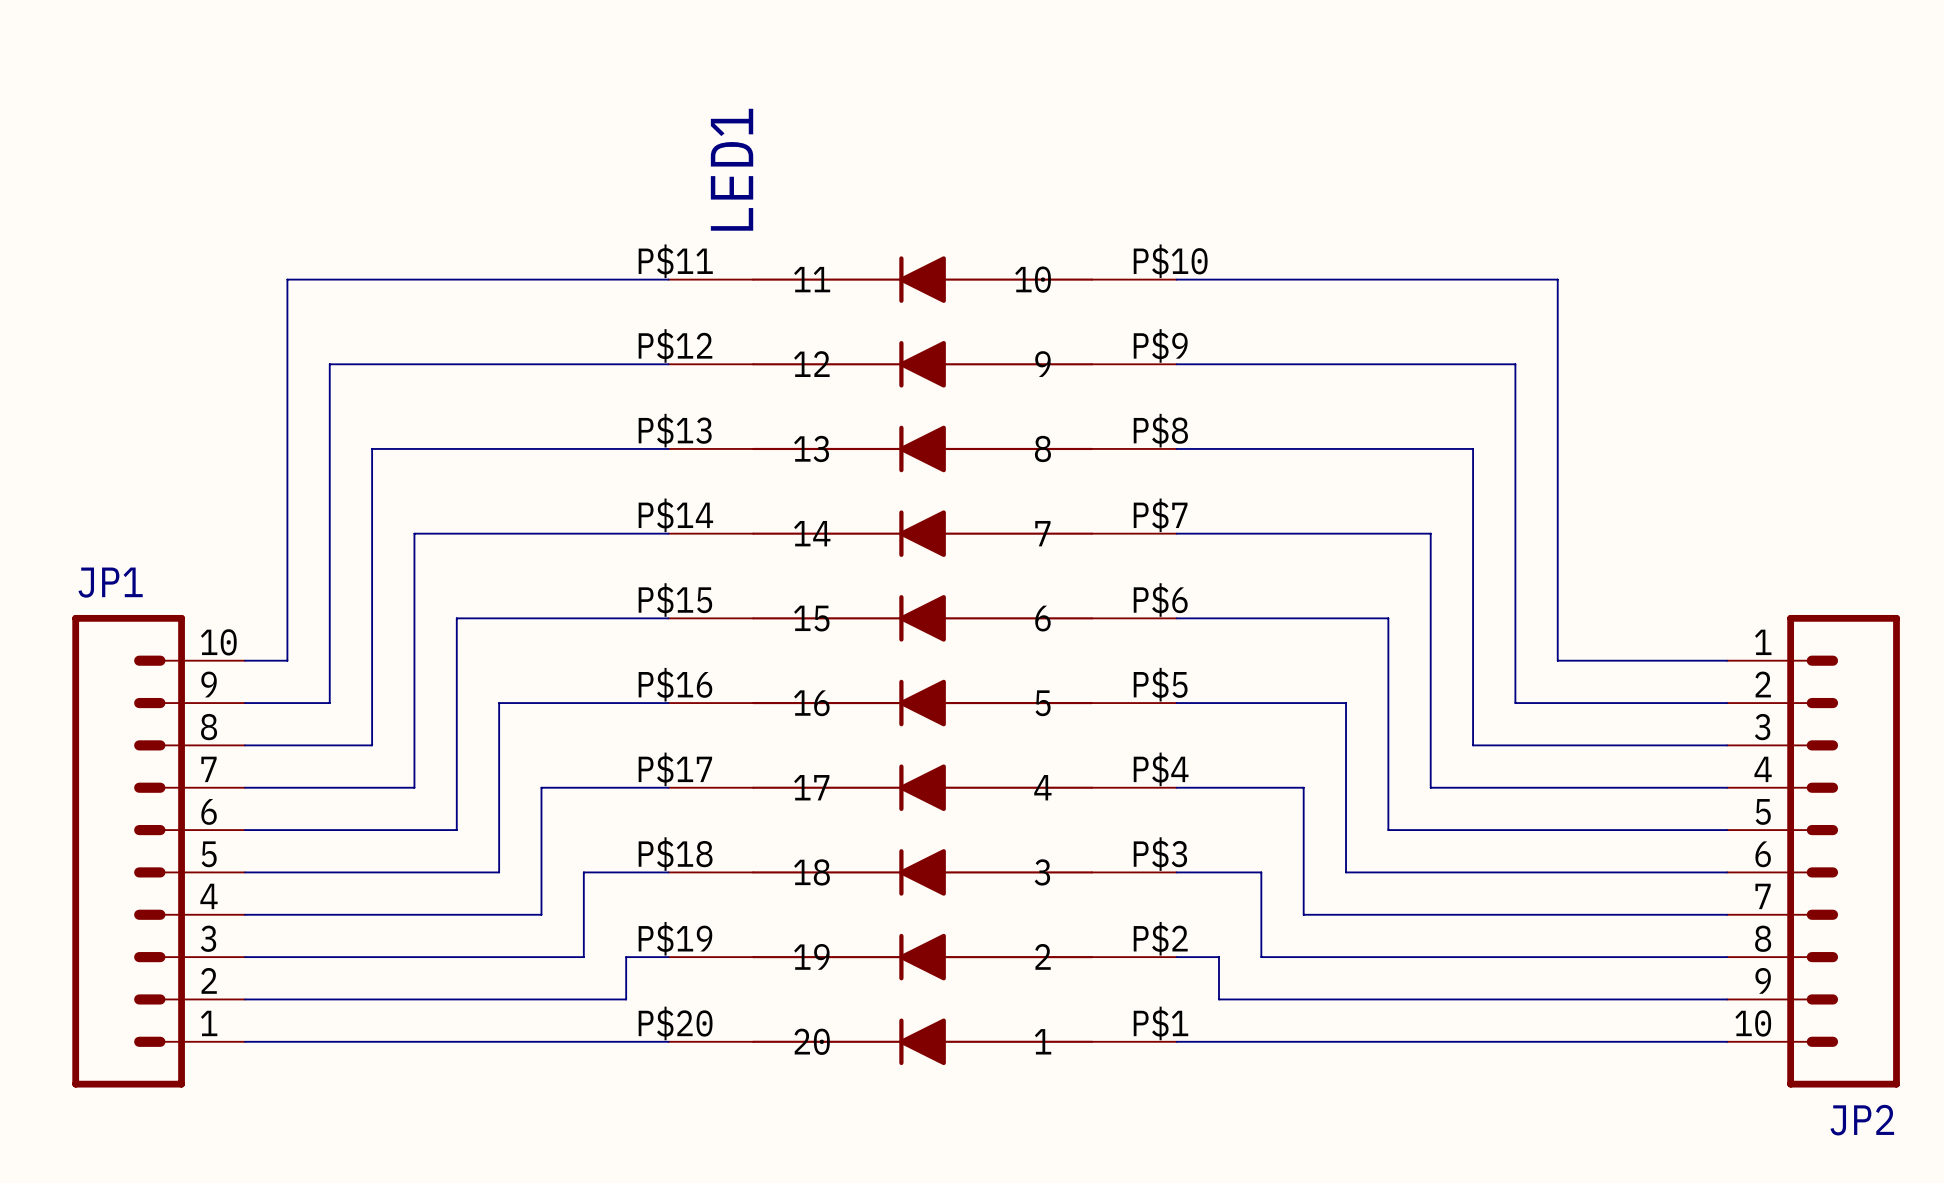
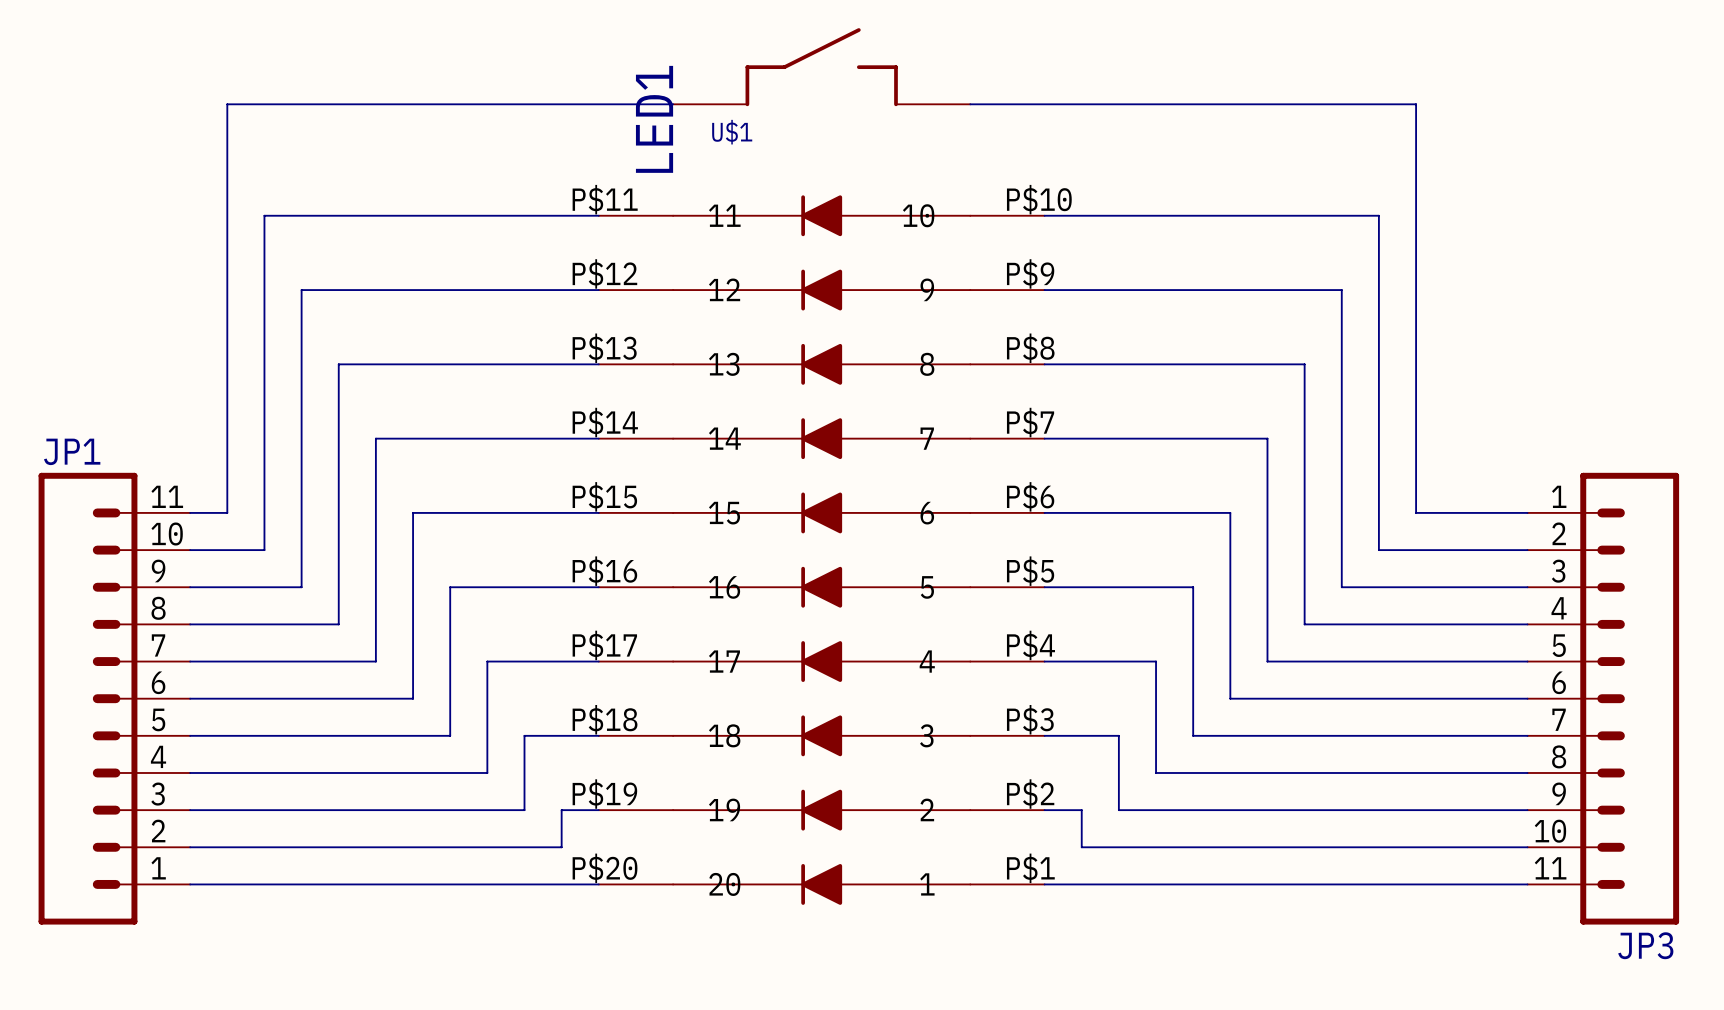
U$1: none -> (821, 67)
wire: none -> (673, 104) (227, 104) (227, 512) (190, 512)
wire: none -> (970, 104) (1416, 104) (1416, 512) (1527, 512)
JP1 symbol: [72, 614, 246, 1088] -> [38, 472, 191, 925]
JP3: none -> (1603, 698)
JP2: (1813, 851) -> none

